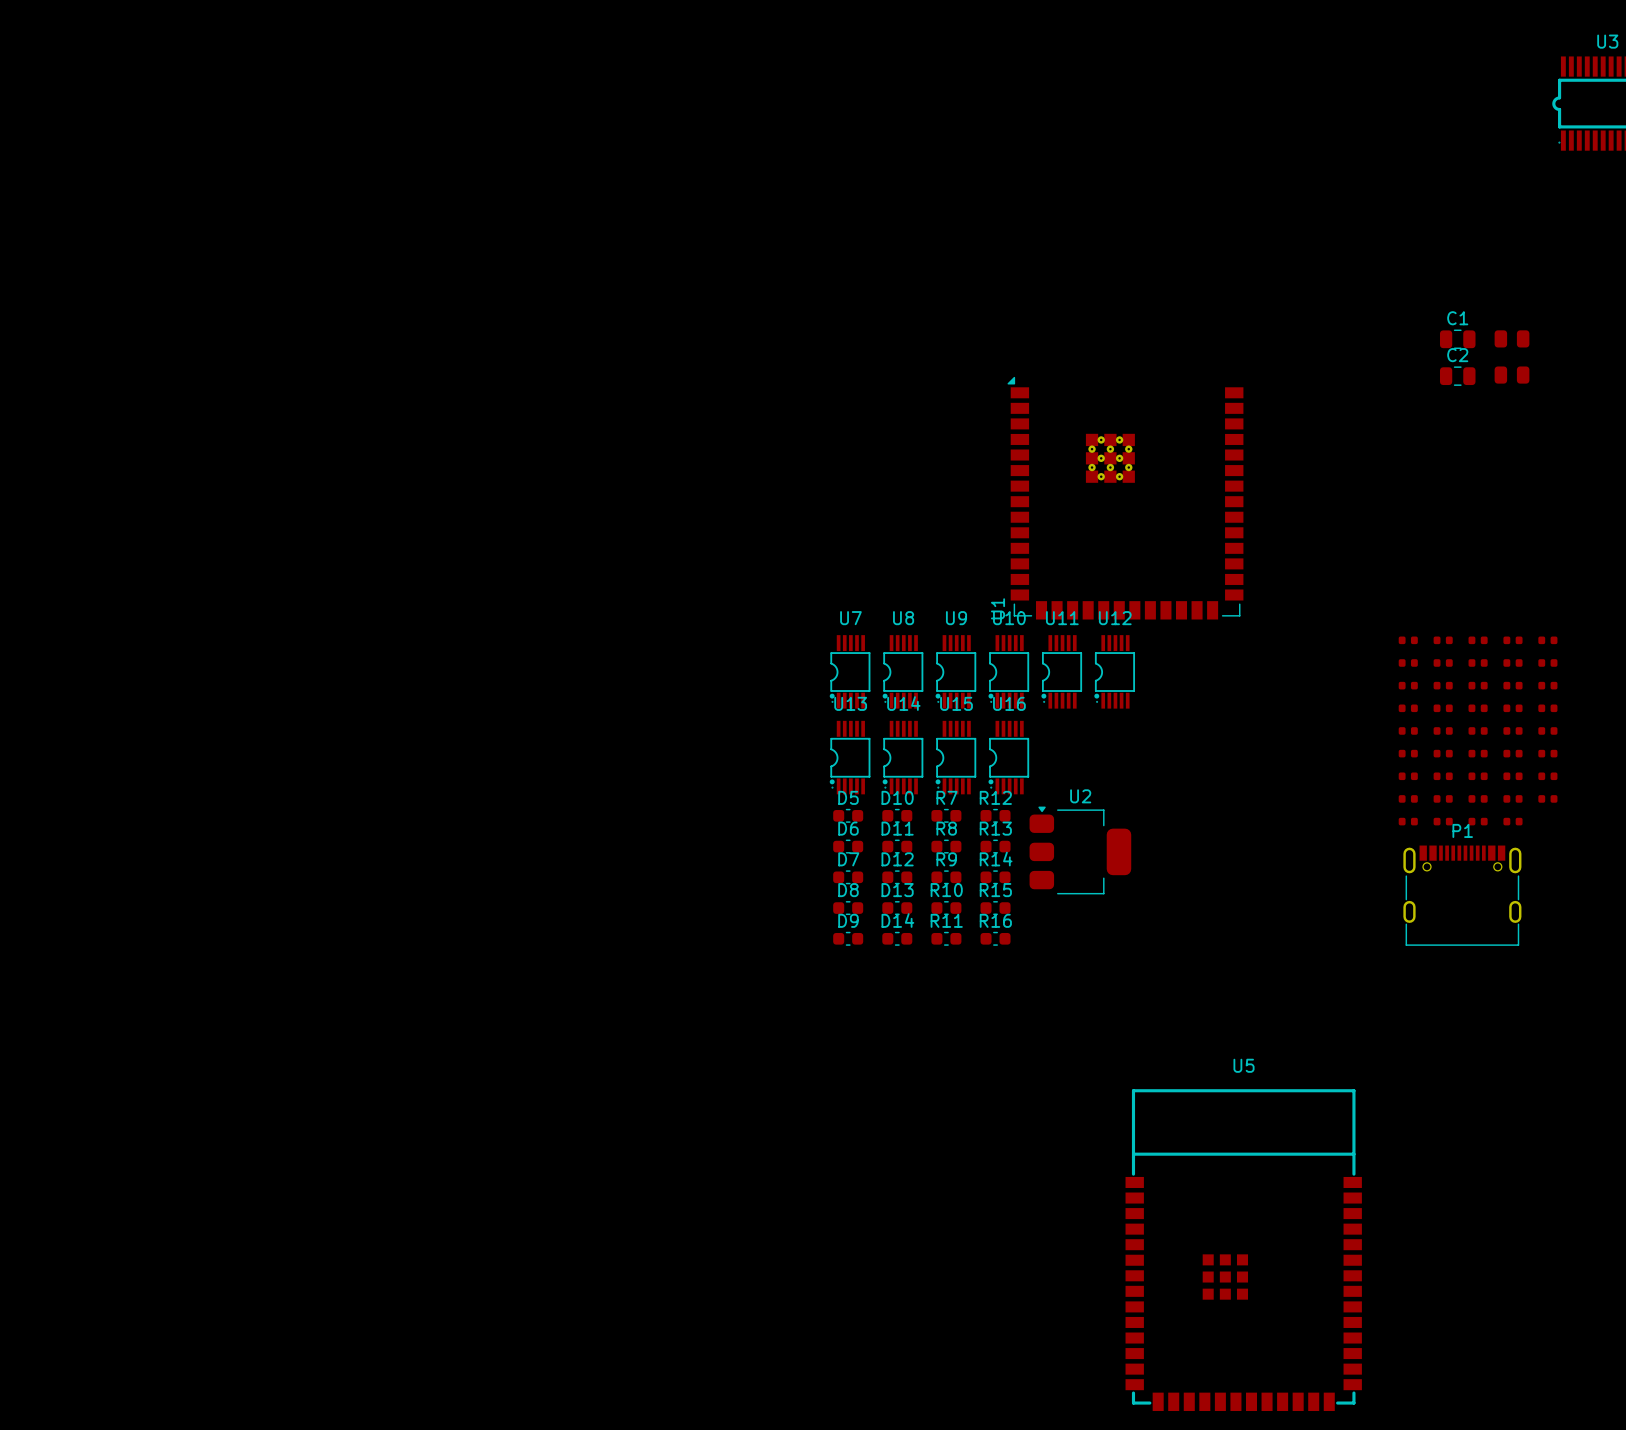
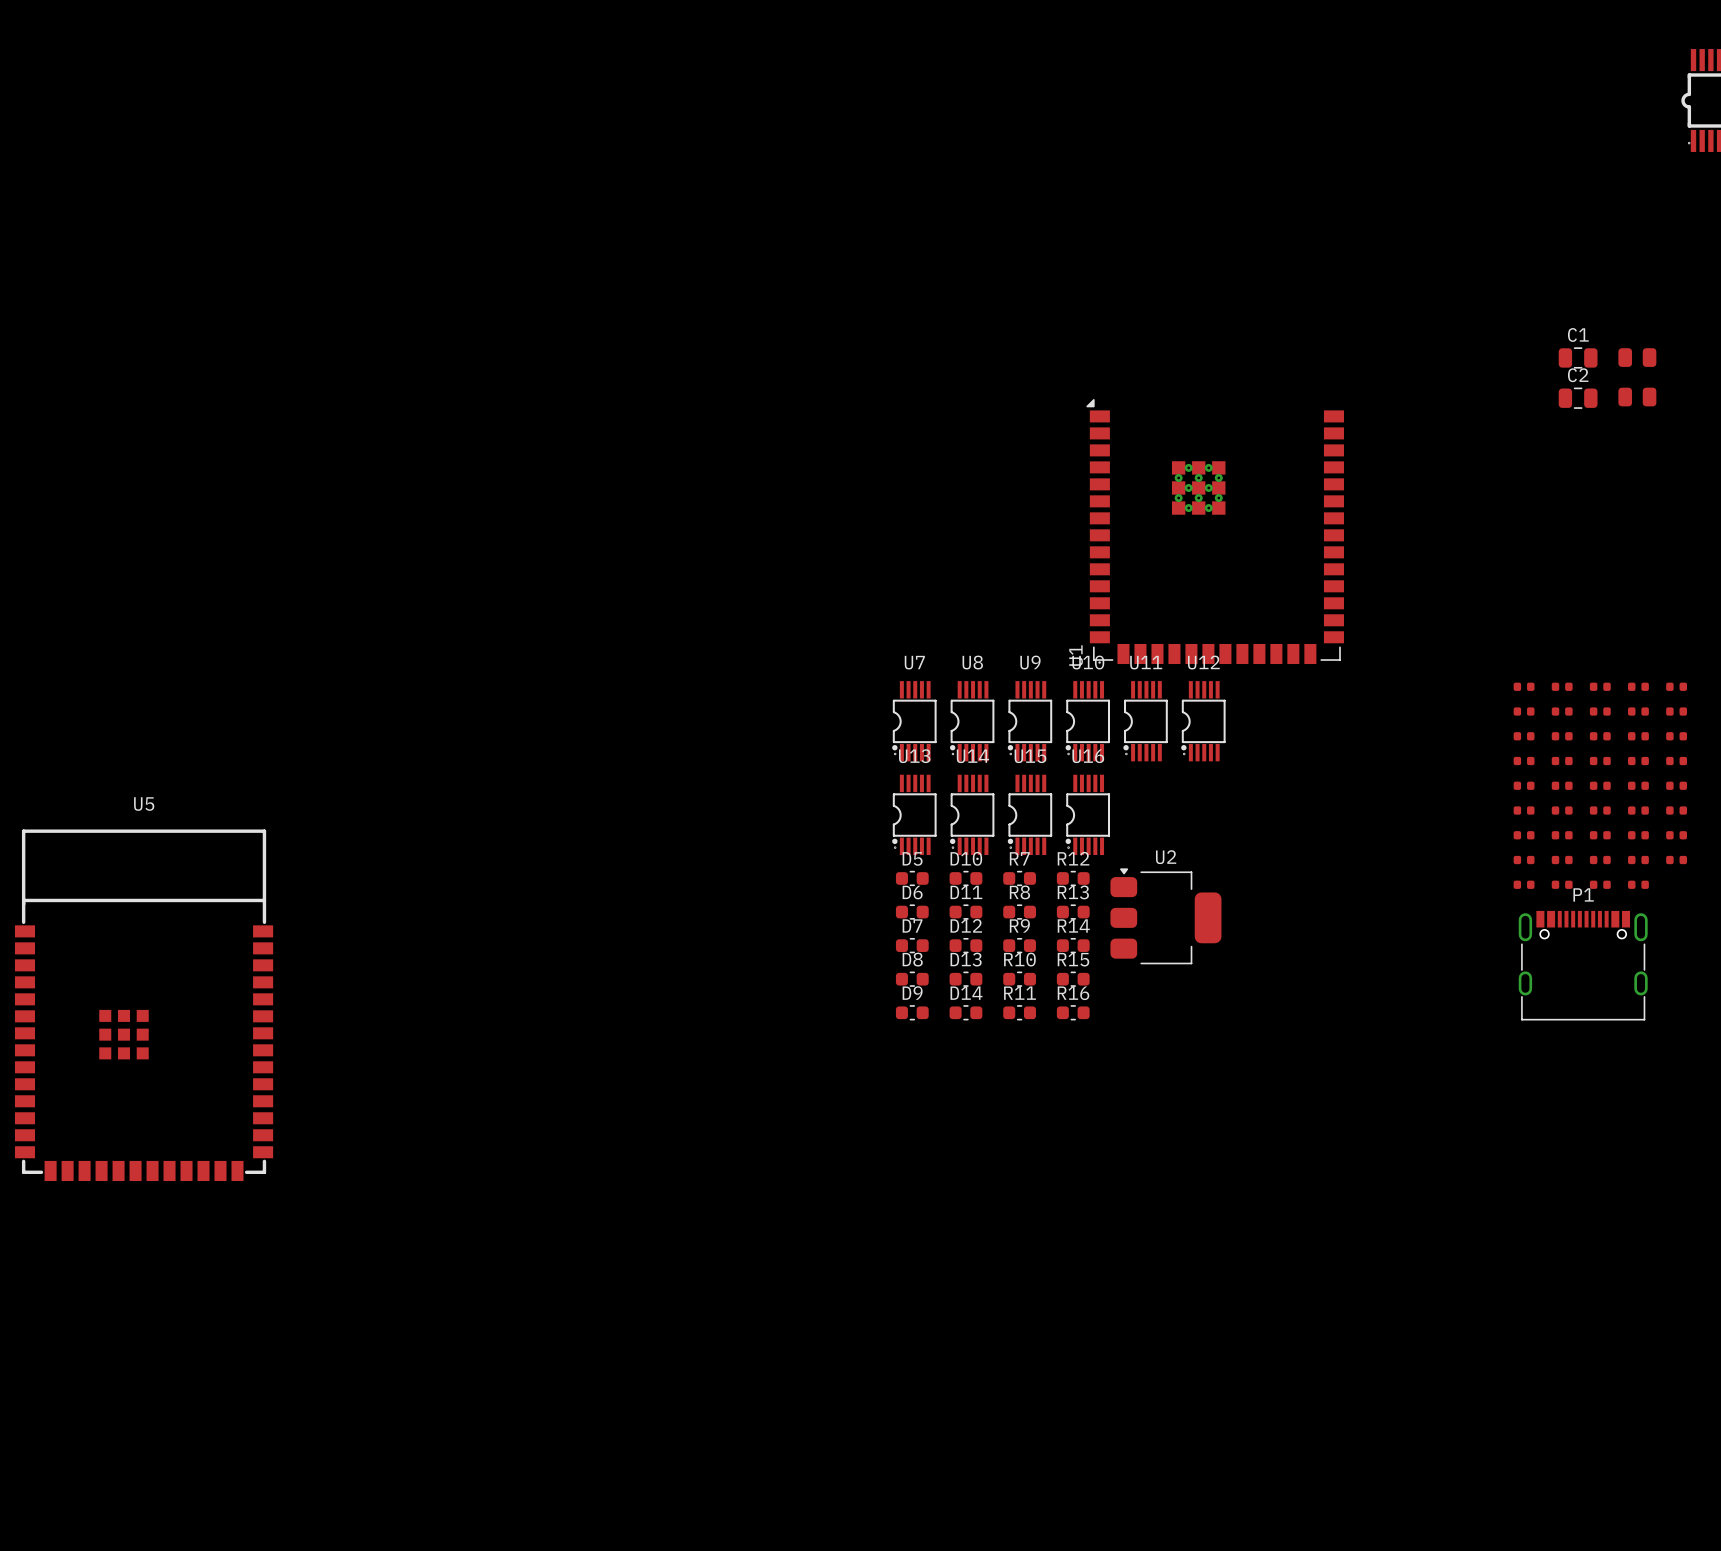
U5 position: (1243, 1250) -> (144, 1005)

